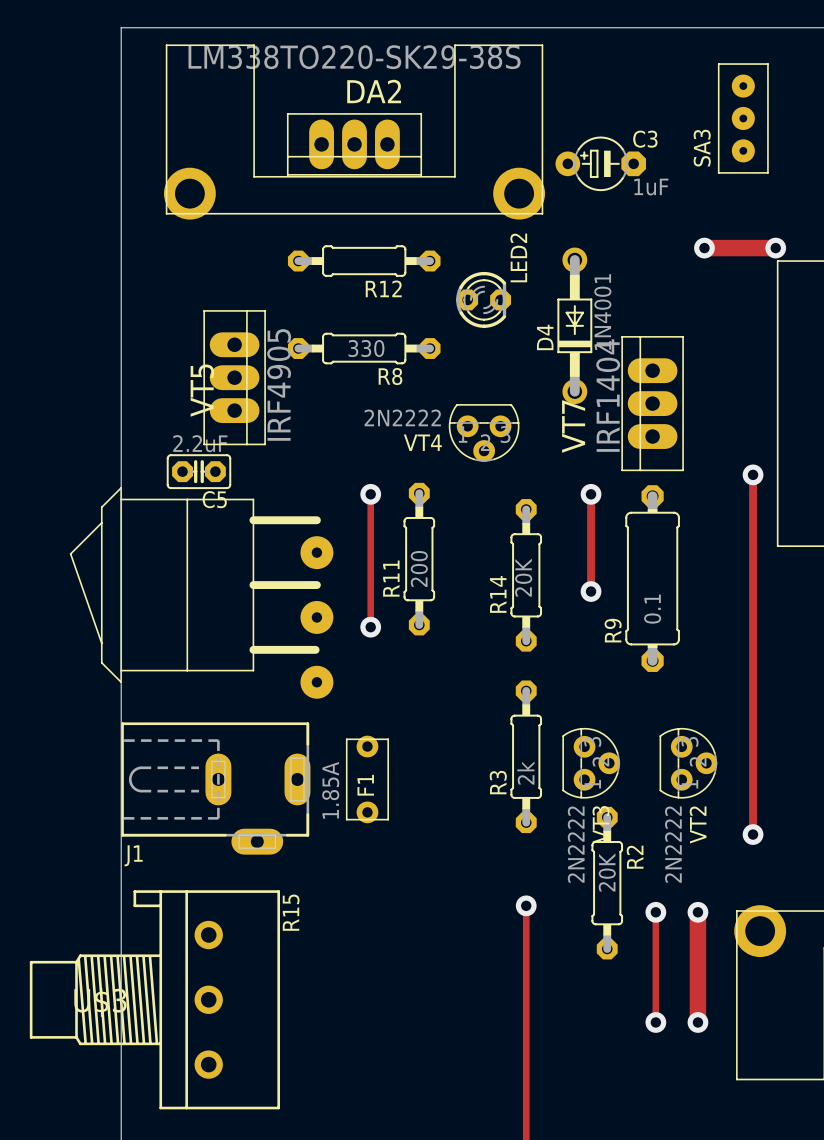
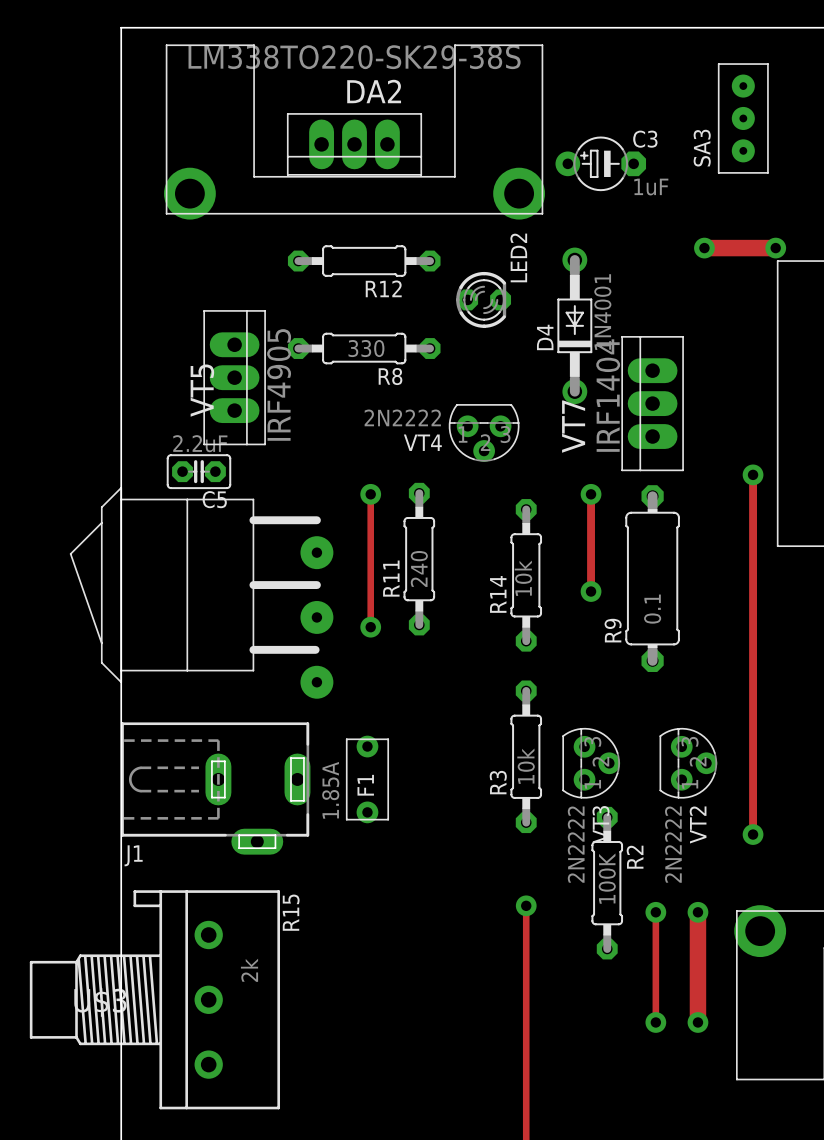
R11 value: 200 (419, 568) -> 240 (419, 568)
R14 value: 20K (523, 577) -> 10k (523, 578)
R3 value: 2k (525, 773) -> 10k (526, 766)
R2 value: 20K (607, 872) -> 100K (607, 878)
R15 value: none -> 2k (249, 970)

